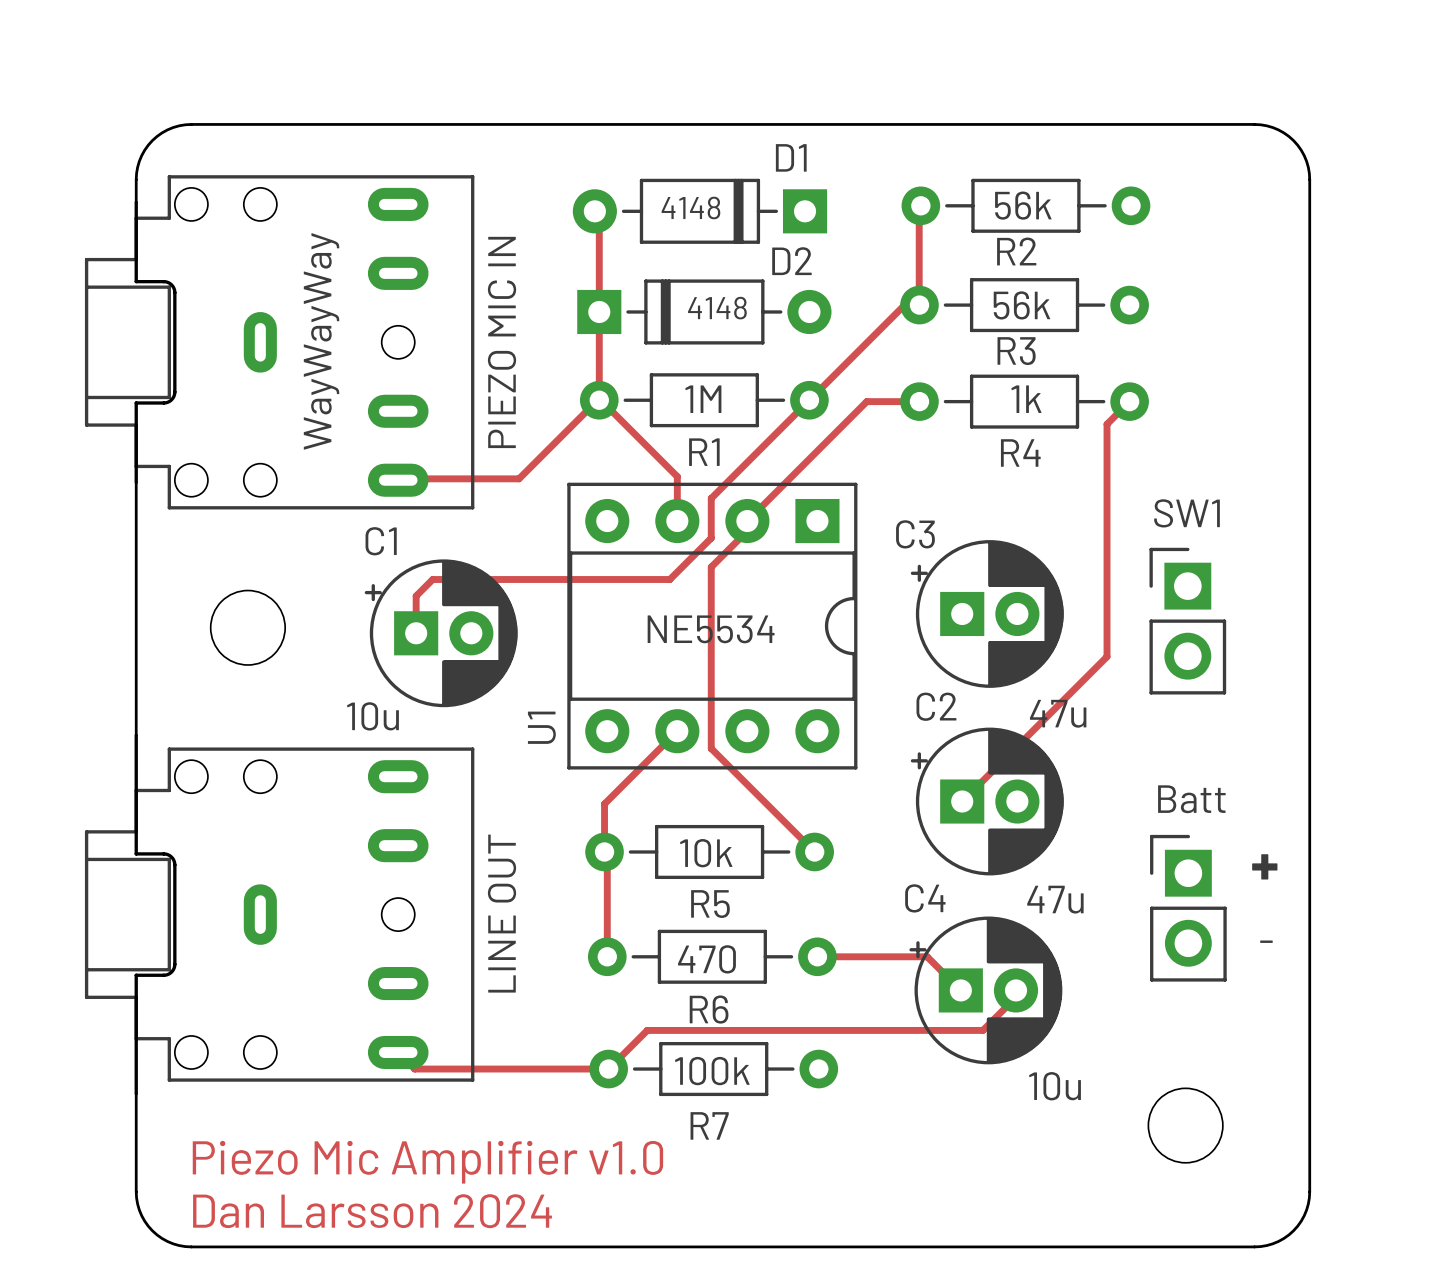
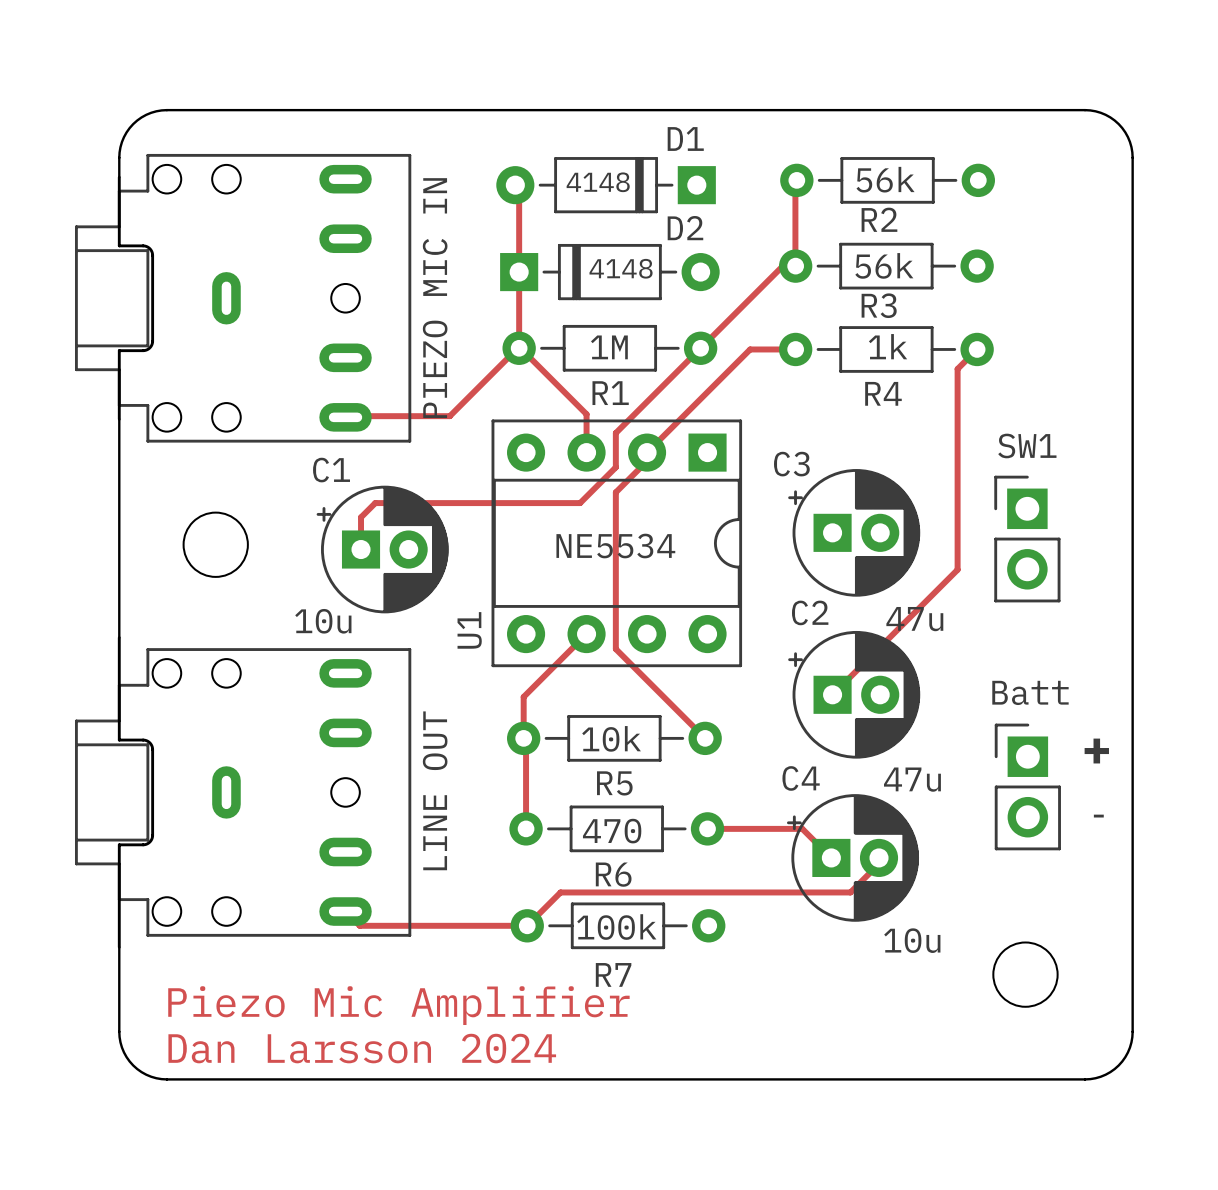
text: WayWayWay (321, 341) -> none
text: Piezo Mic Amplifier v1.0 (427, 1162) -> Piezo Mic Amplifier (398, 1005)

